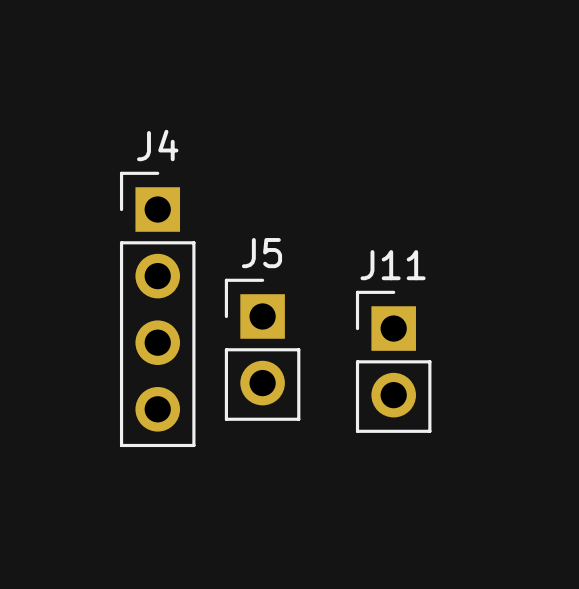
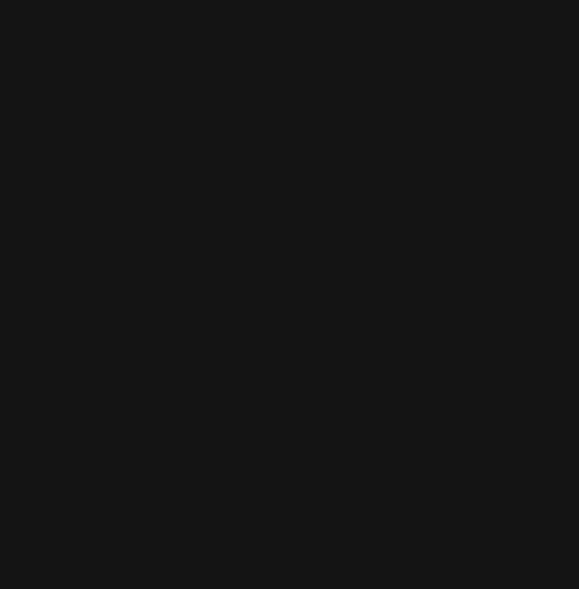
J4: (157, 309) -> none
J5: (262, 349) -> none
J11: (393, 361) -> none

